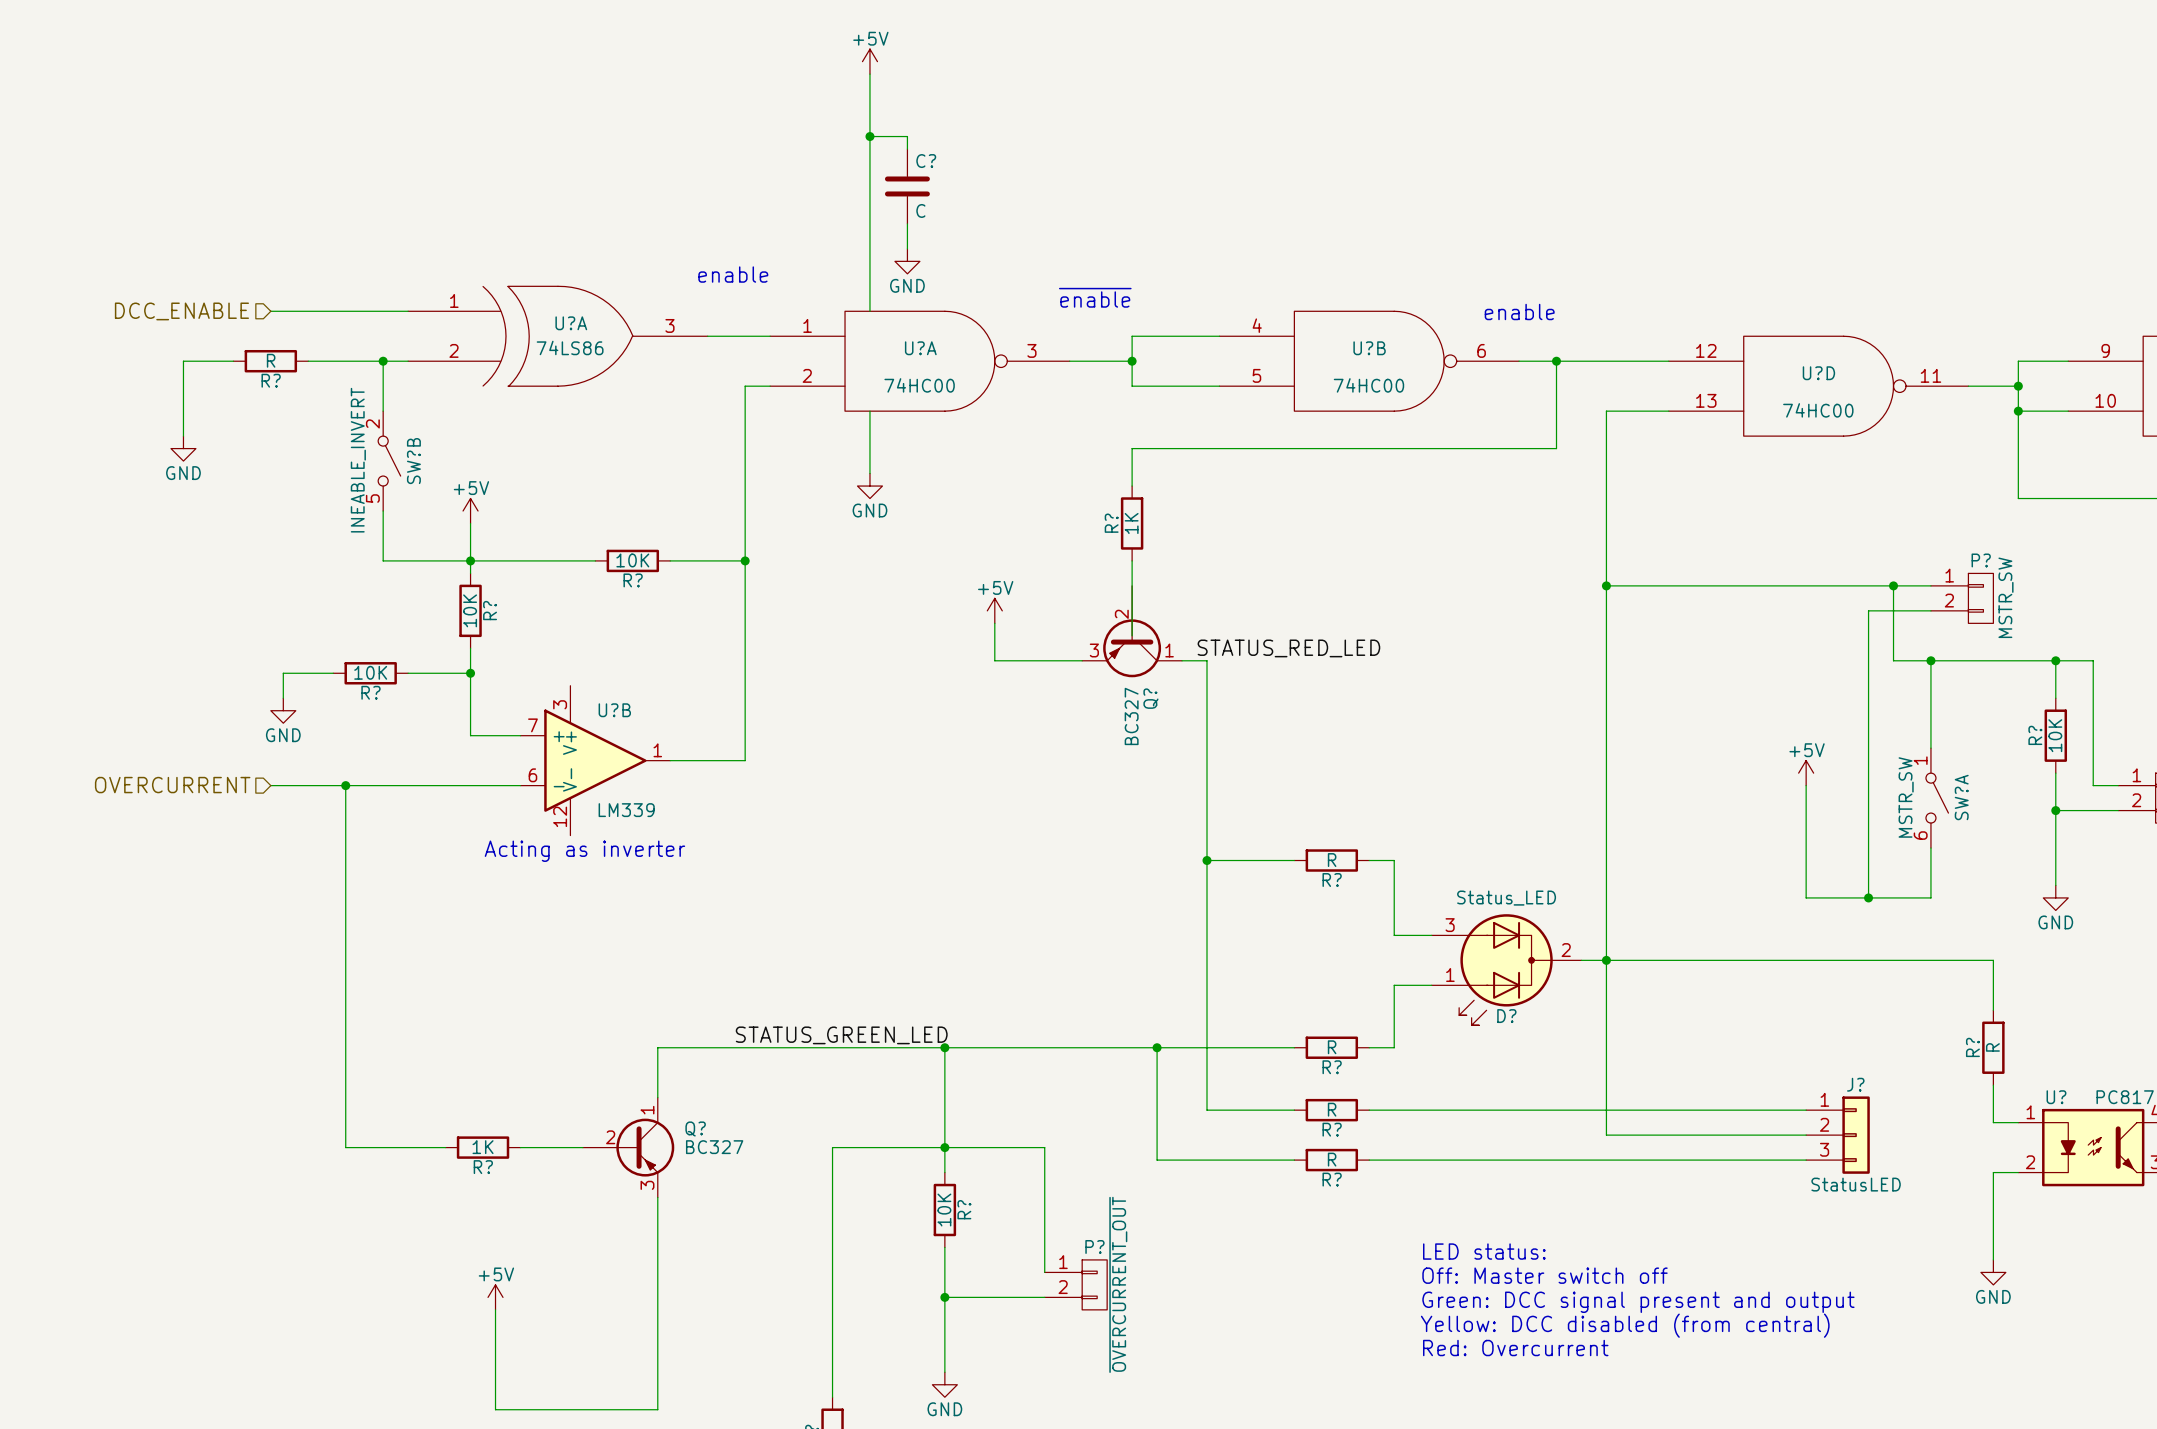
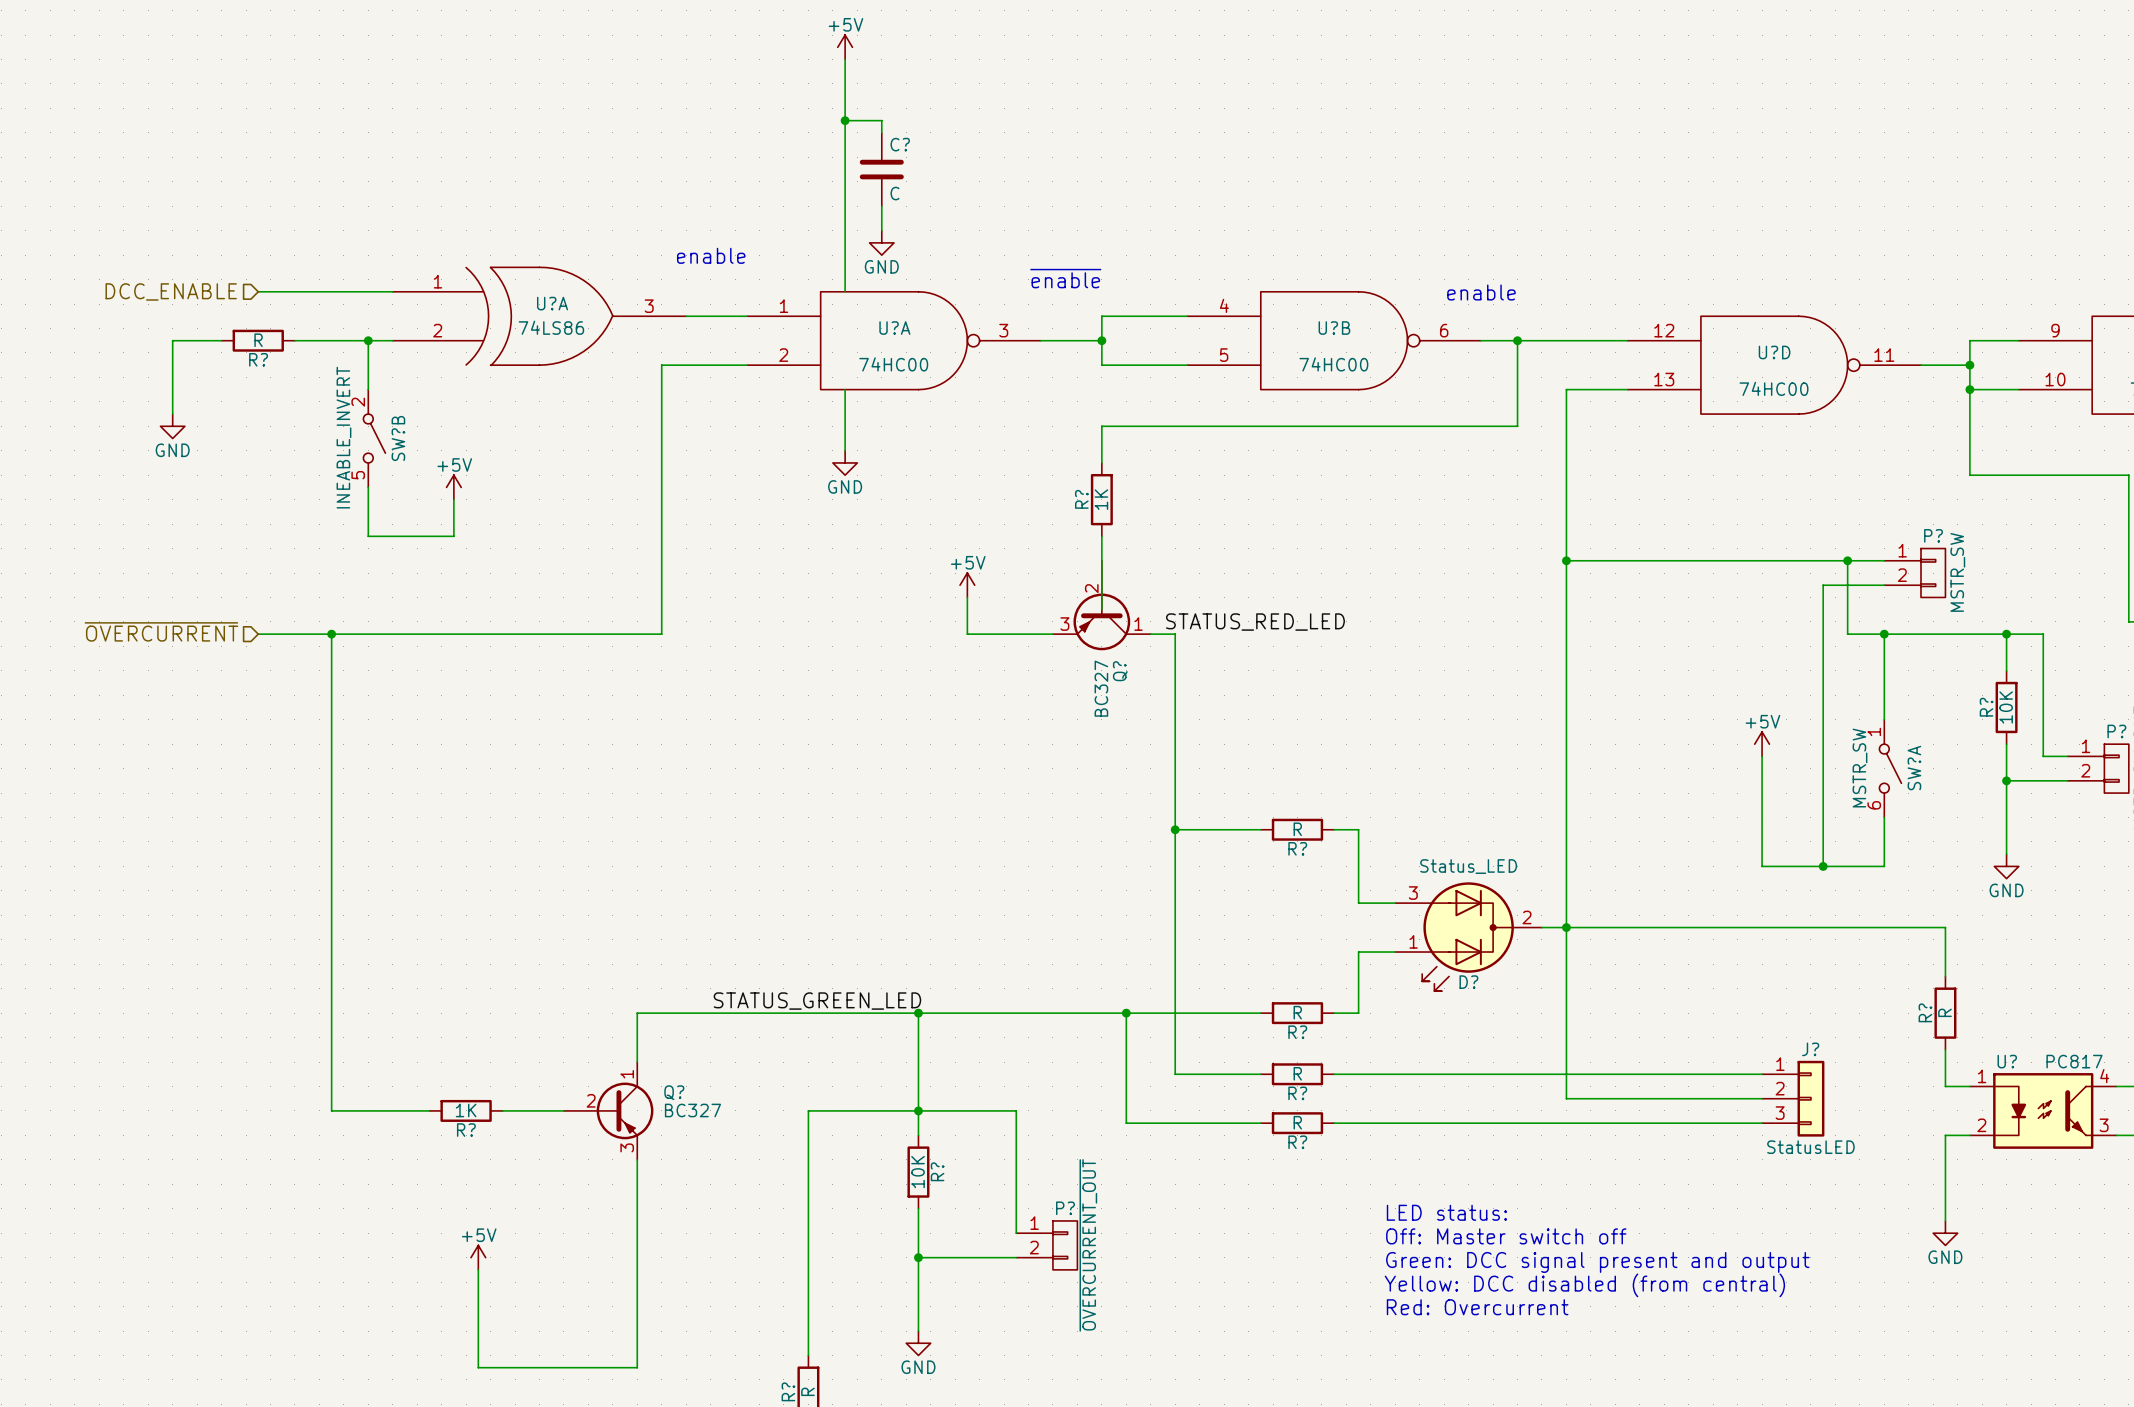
wire: (745, 386) (745, 760) (670, 760) -> (722, 365) (661, 365) (661, 634) (258, 634)
junction: (470, 560) -> none
wire: (595, 560) (470, 560) (470, 573) -> none
R?: 10K (632, 560) -> none
wire: (670, 560) (745, 560) -> none
junction: (745, 560) -> none
R?: 10K (470, 610) -> none
wire: (470, 648) (470, 735) (520, 735) -> none
hierarchical label: none -> ~{OVERCURRENT} (161, 631)
wire: none -> (331, 634) (331, 756)
junction: none -> (331, 634)
wire: (333, 673) (283, 673) (283, 698) -> none
R?: 10K (370, 673) -> none
wire: (408, 673) (470, 673) -> none
junction: (470, 673) -> none
power symbol: GND (283, 710) -> none
U?B: LM339 (595, 760) -> none
hierarchical label: OVERCURRENT (172, 785) -> none
wire: (270, 785) (520, 785) -> none
junction: (345, 785) -> none
text: Acting as inverter (584, 851) -> none

